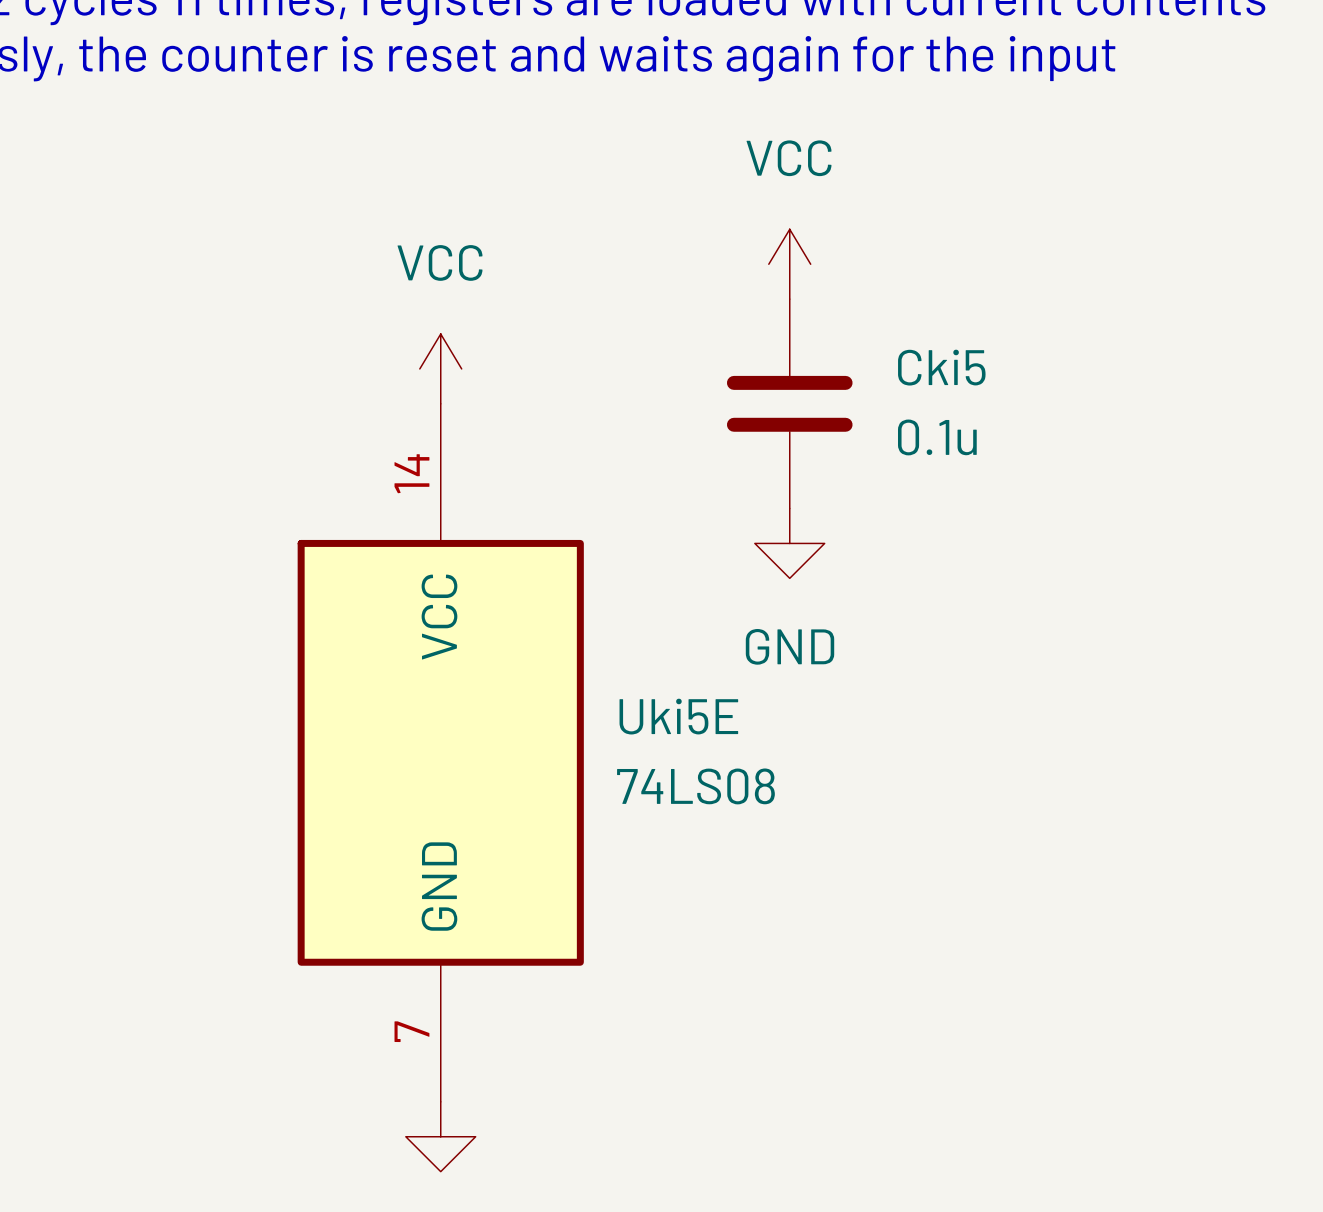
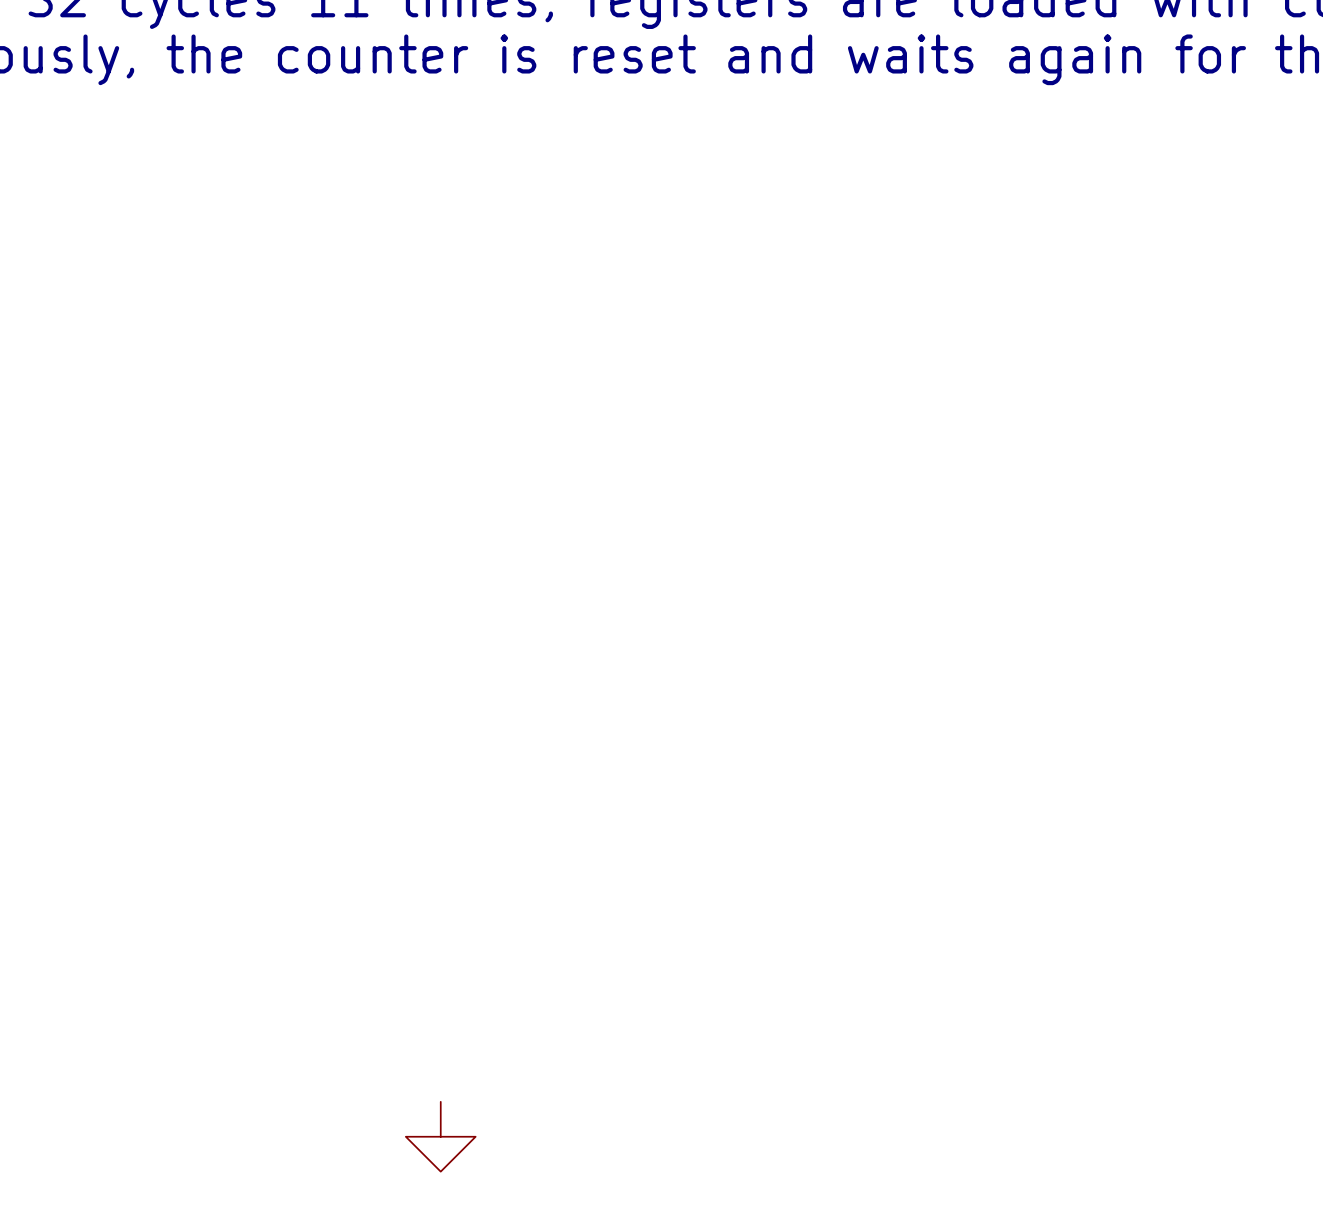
power symbol: VCC (789, 264) -> none
power symbol: VCC (440, 368) -> none
Cki5: 0.1u (789, 403) -> none
power symbol: GND (789, 543) -> none
Uki5E: 74LS08 (440, 752) -> none

